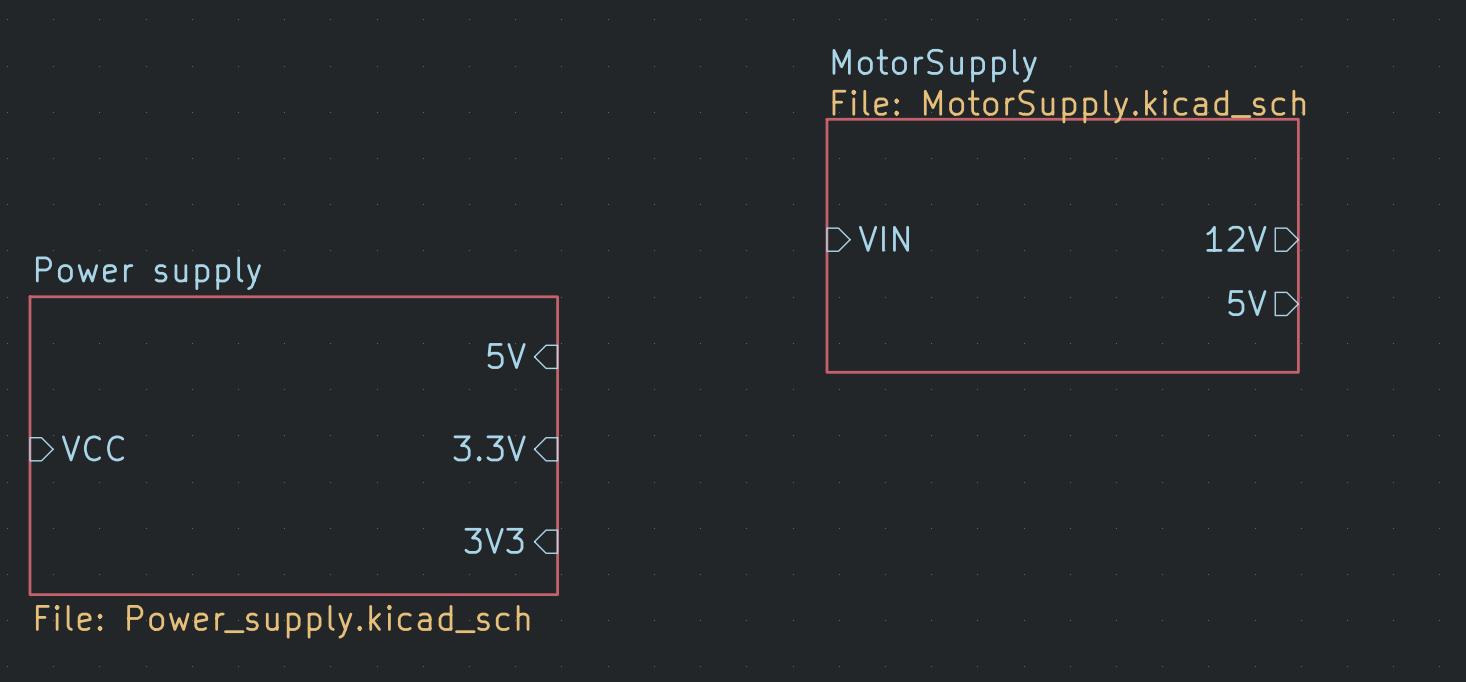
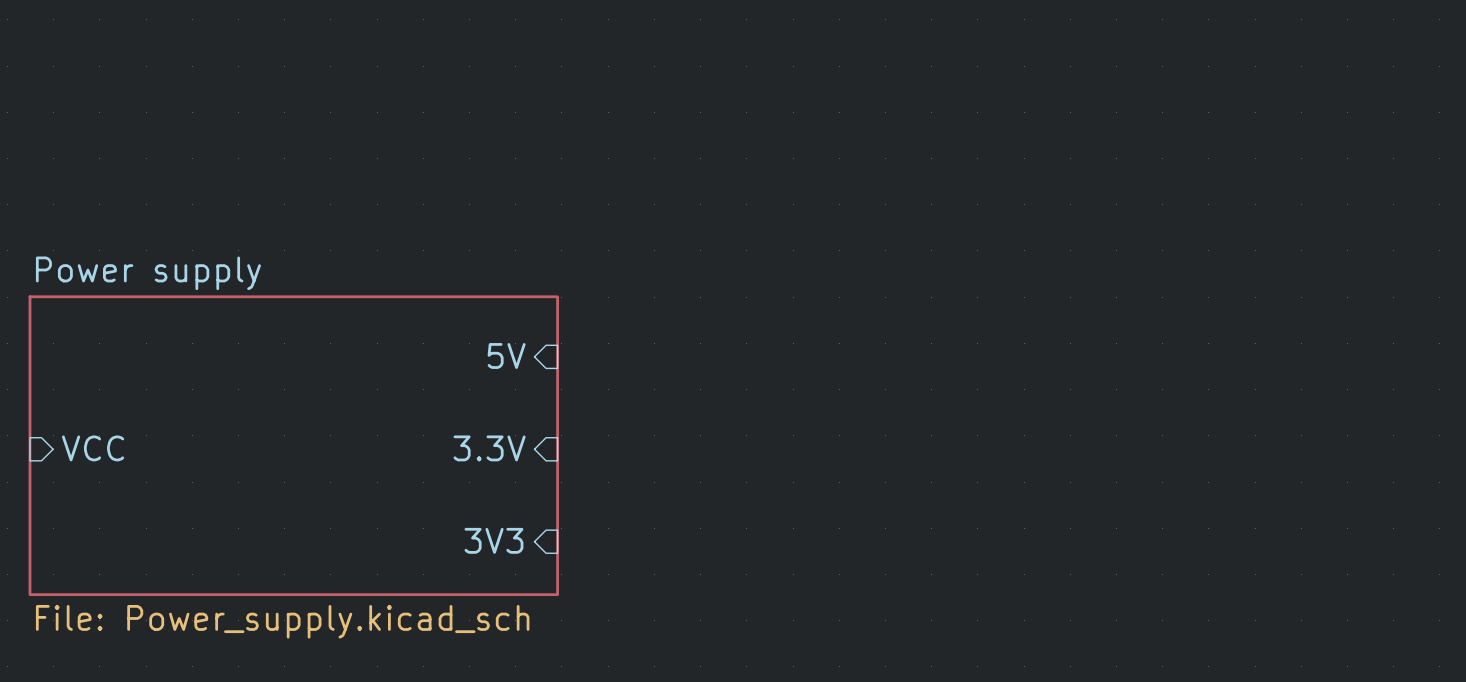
sheet pin: VIN (883, 238) -> none
sheet pin: 12V (1236, 238) -> none
sheet MotorSupply: File: MotorSupply.kicad_sch (1062, 245) -> none
sheet pin: 5V (1247, 303) -> none

